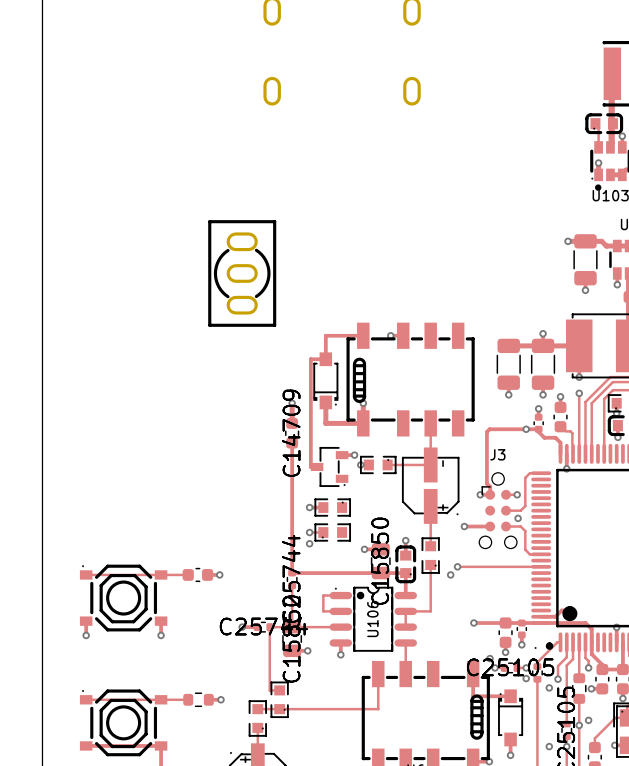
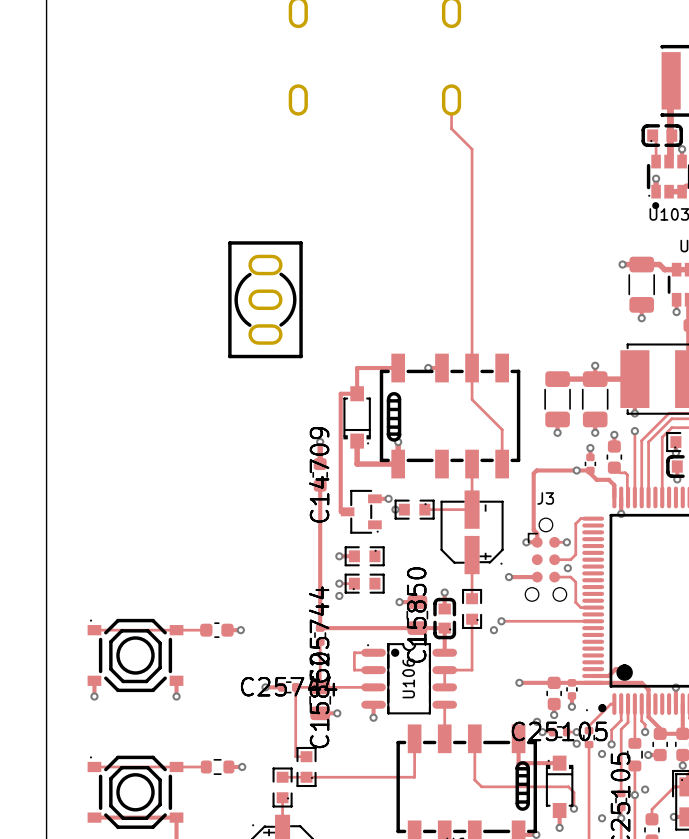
track: none -> (451, 100) (451, 128) (472, 149) (472, 399) (502, 429) (502, 464)
track: none -> (474, 738) (474, 779) (481, 786) (568, 786) (574, 792) (574, 808)
via: none -> (574, 808)

